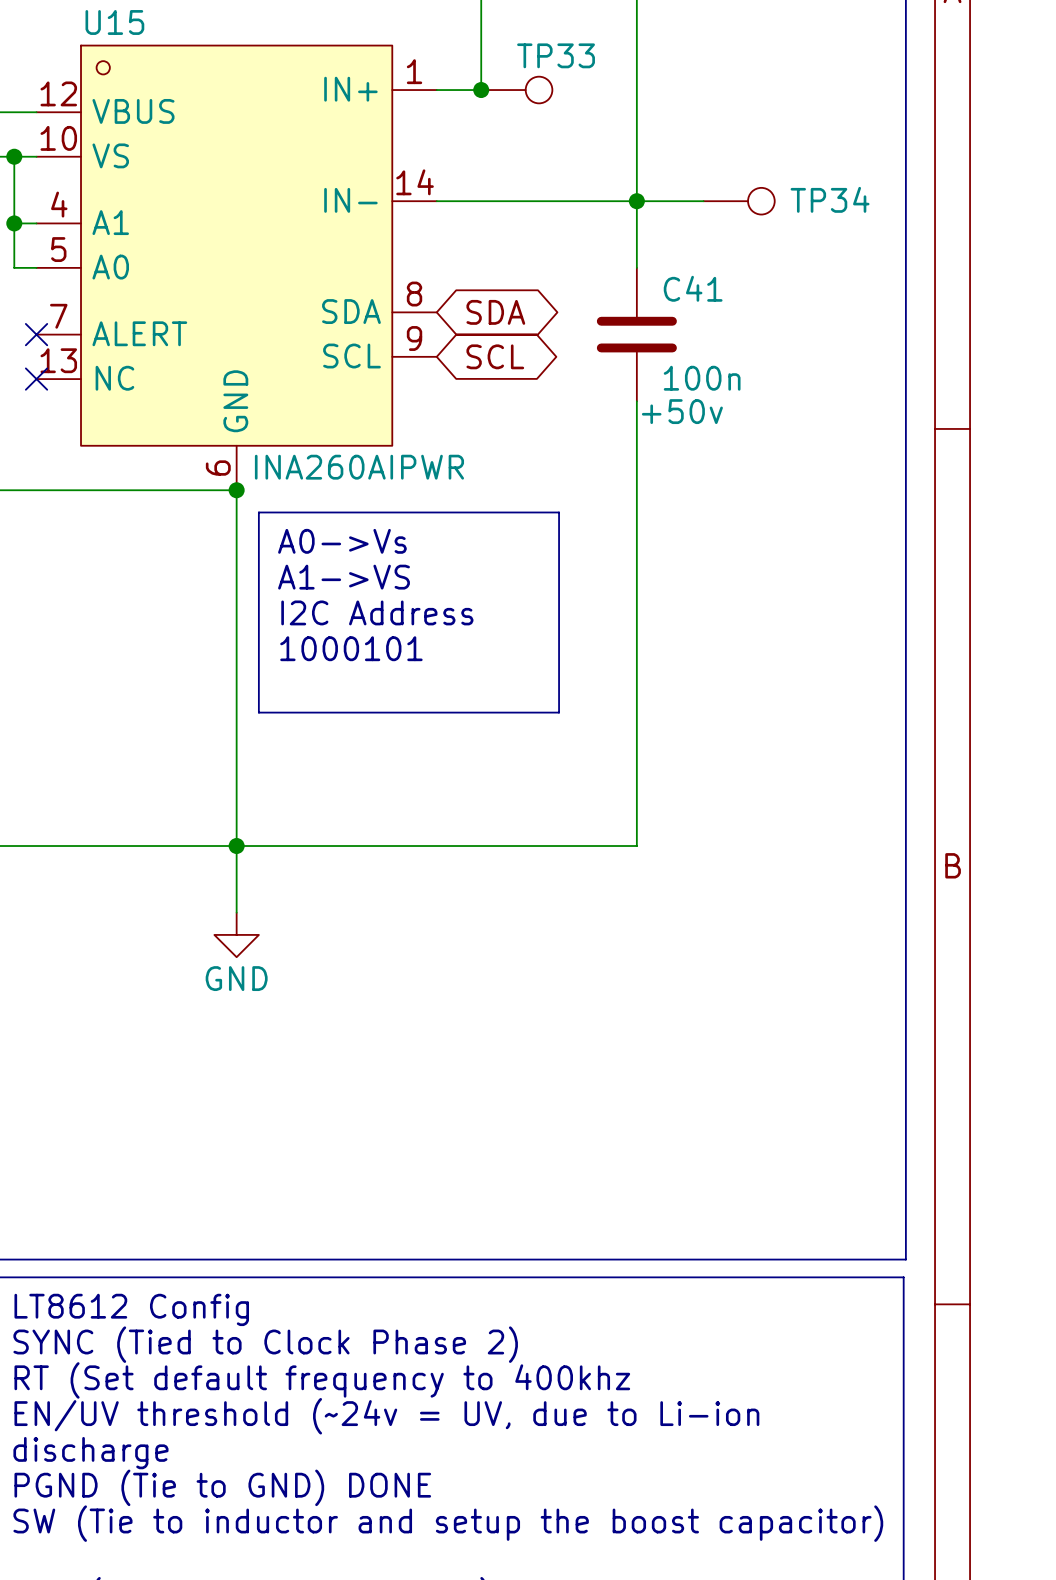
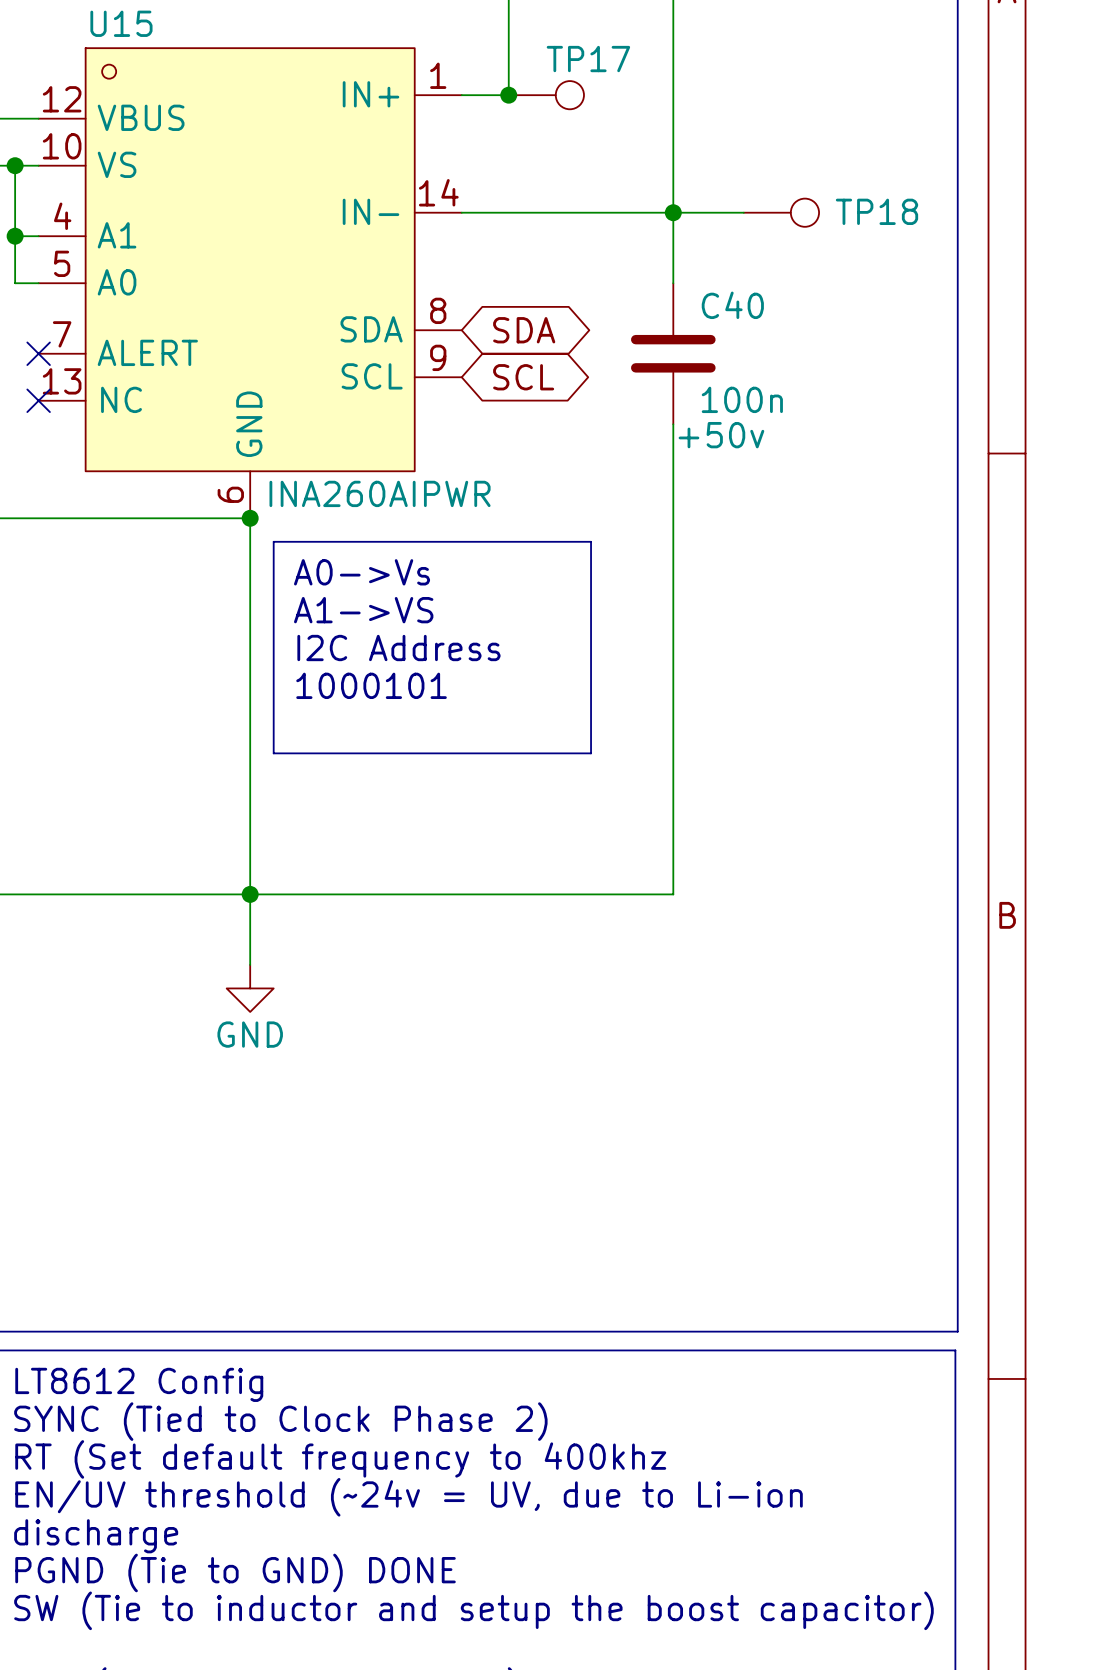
TP33 name: TP33 (556, 55) -> TP17 (588, 59)
TP34 name: TP34 (830, 199) -> TP18 (876, 211)
C41 name: C41 (693, 288) -> C40 (732, 305)

